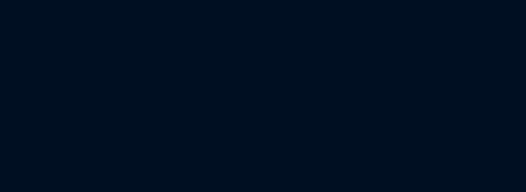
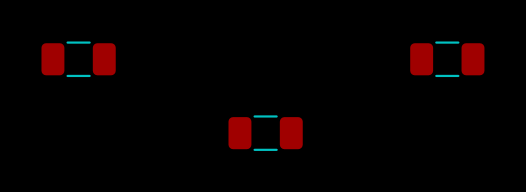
part: none -> (78, 59)
part: none -> (447, 59)
part: none -> (265, 133)

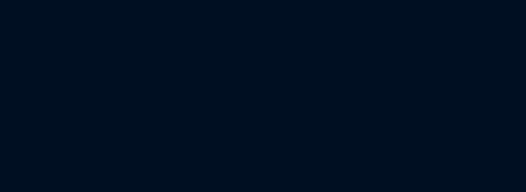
part: (78, 59) -> none
part: (447, 59) -> none
part: (265, 133) -> none

